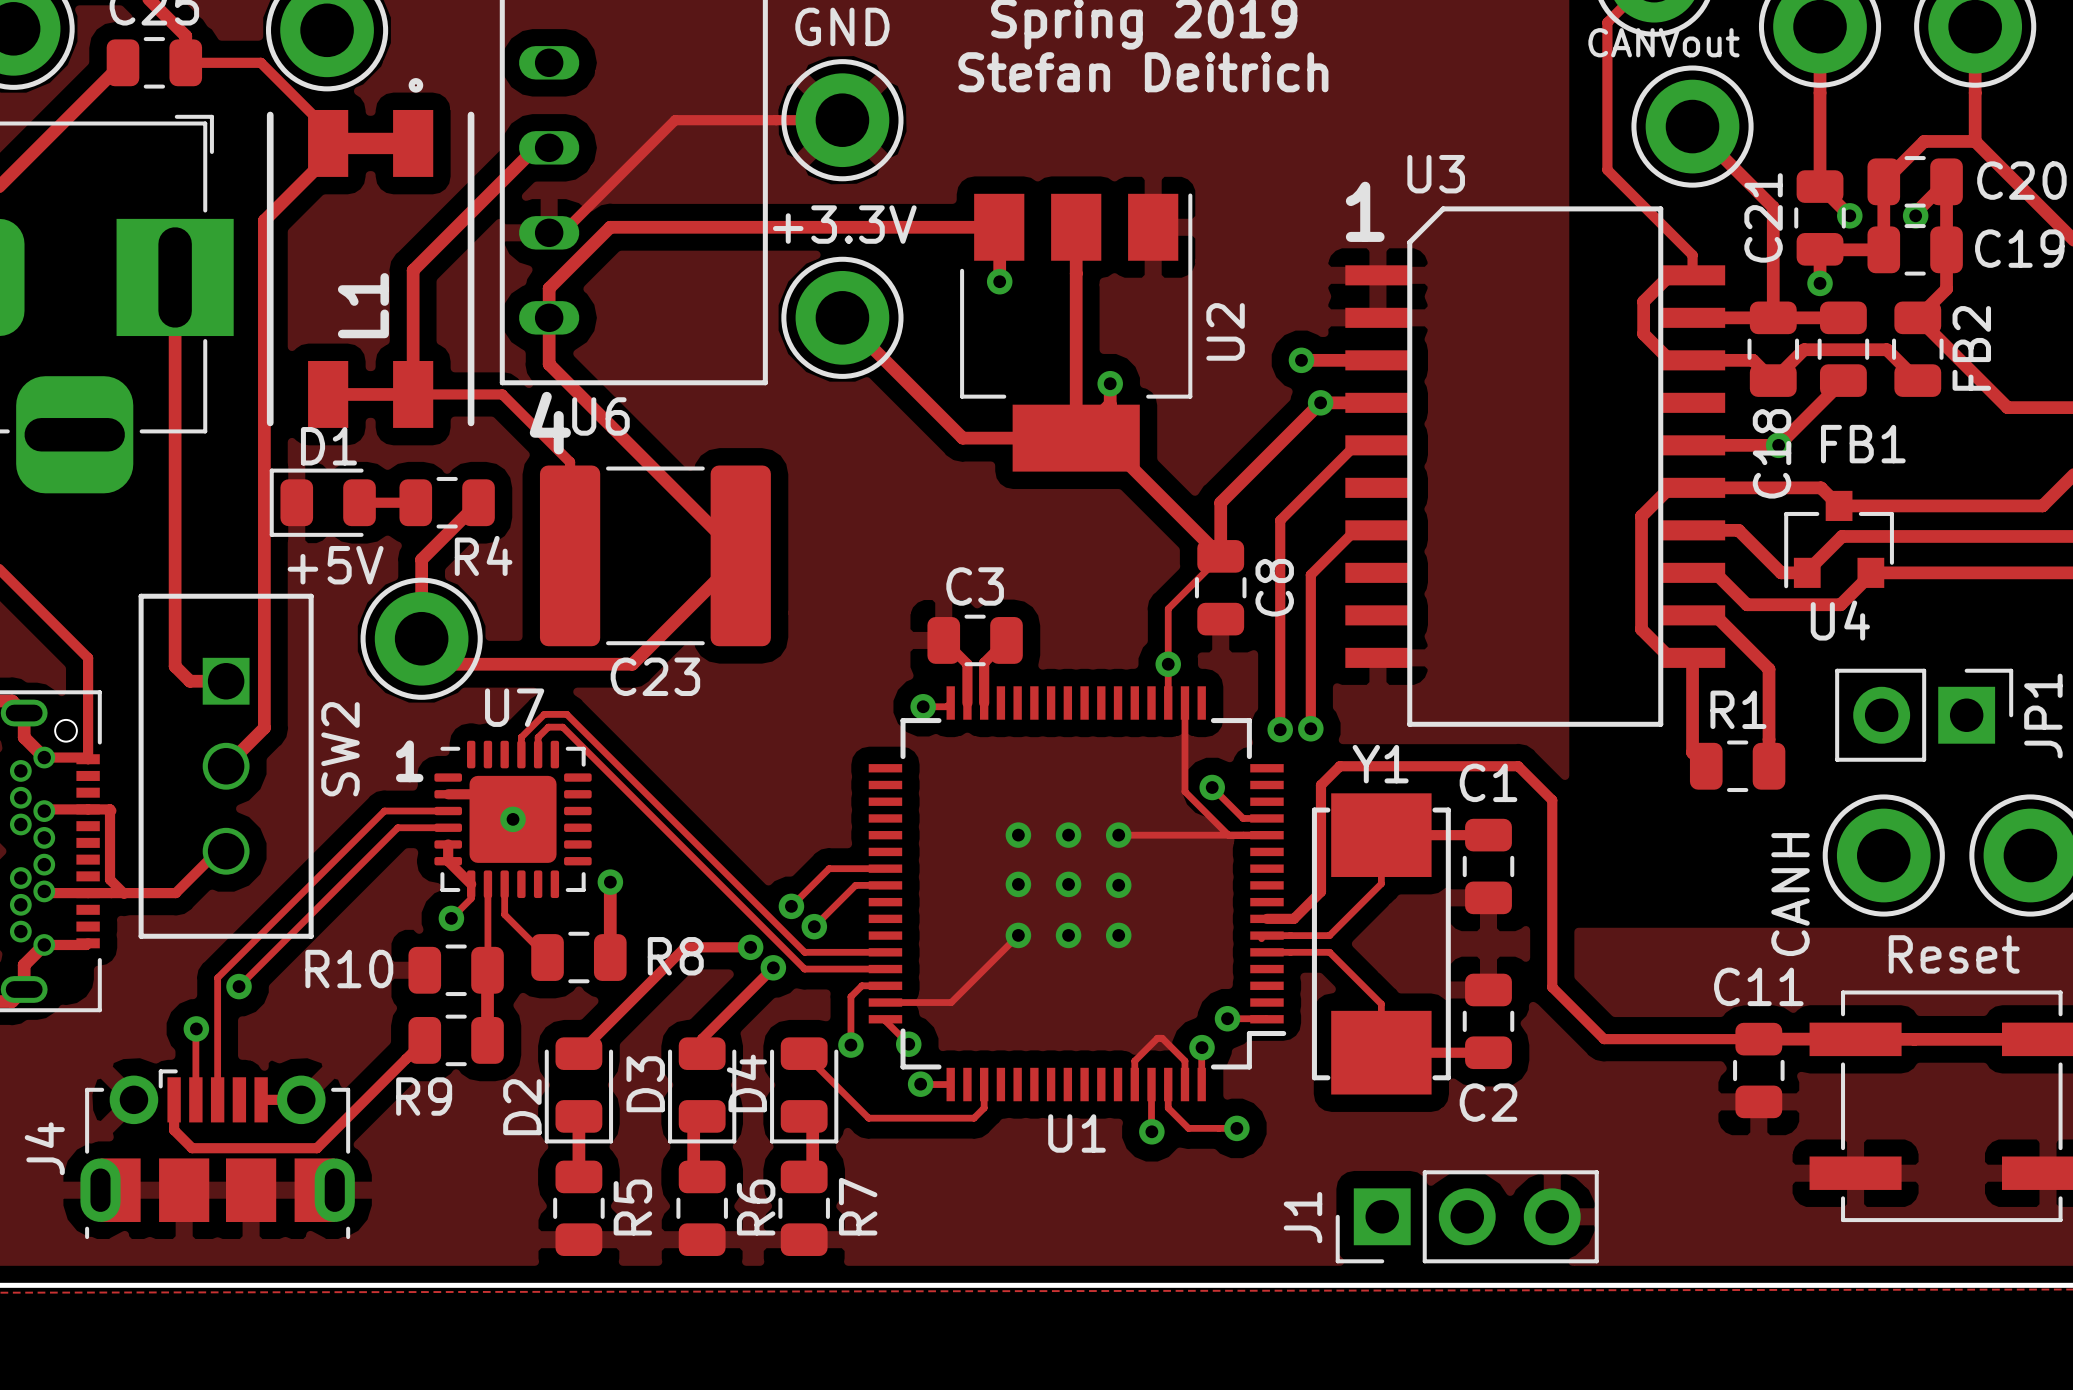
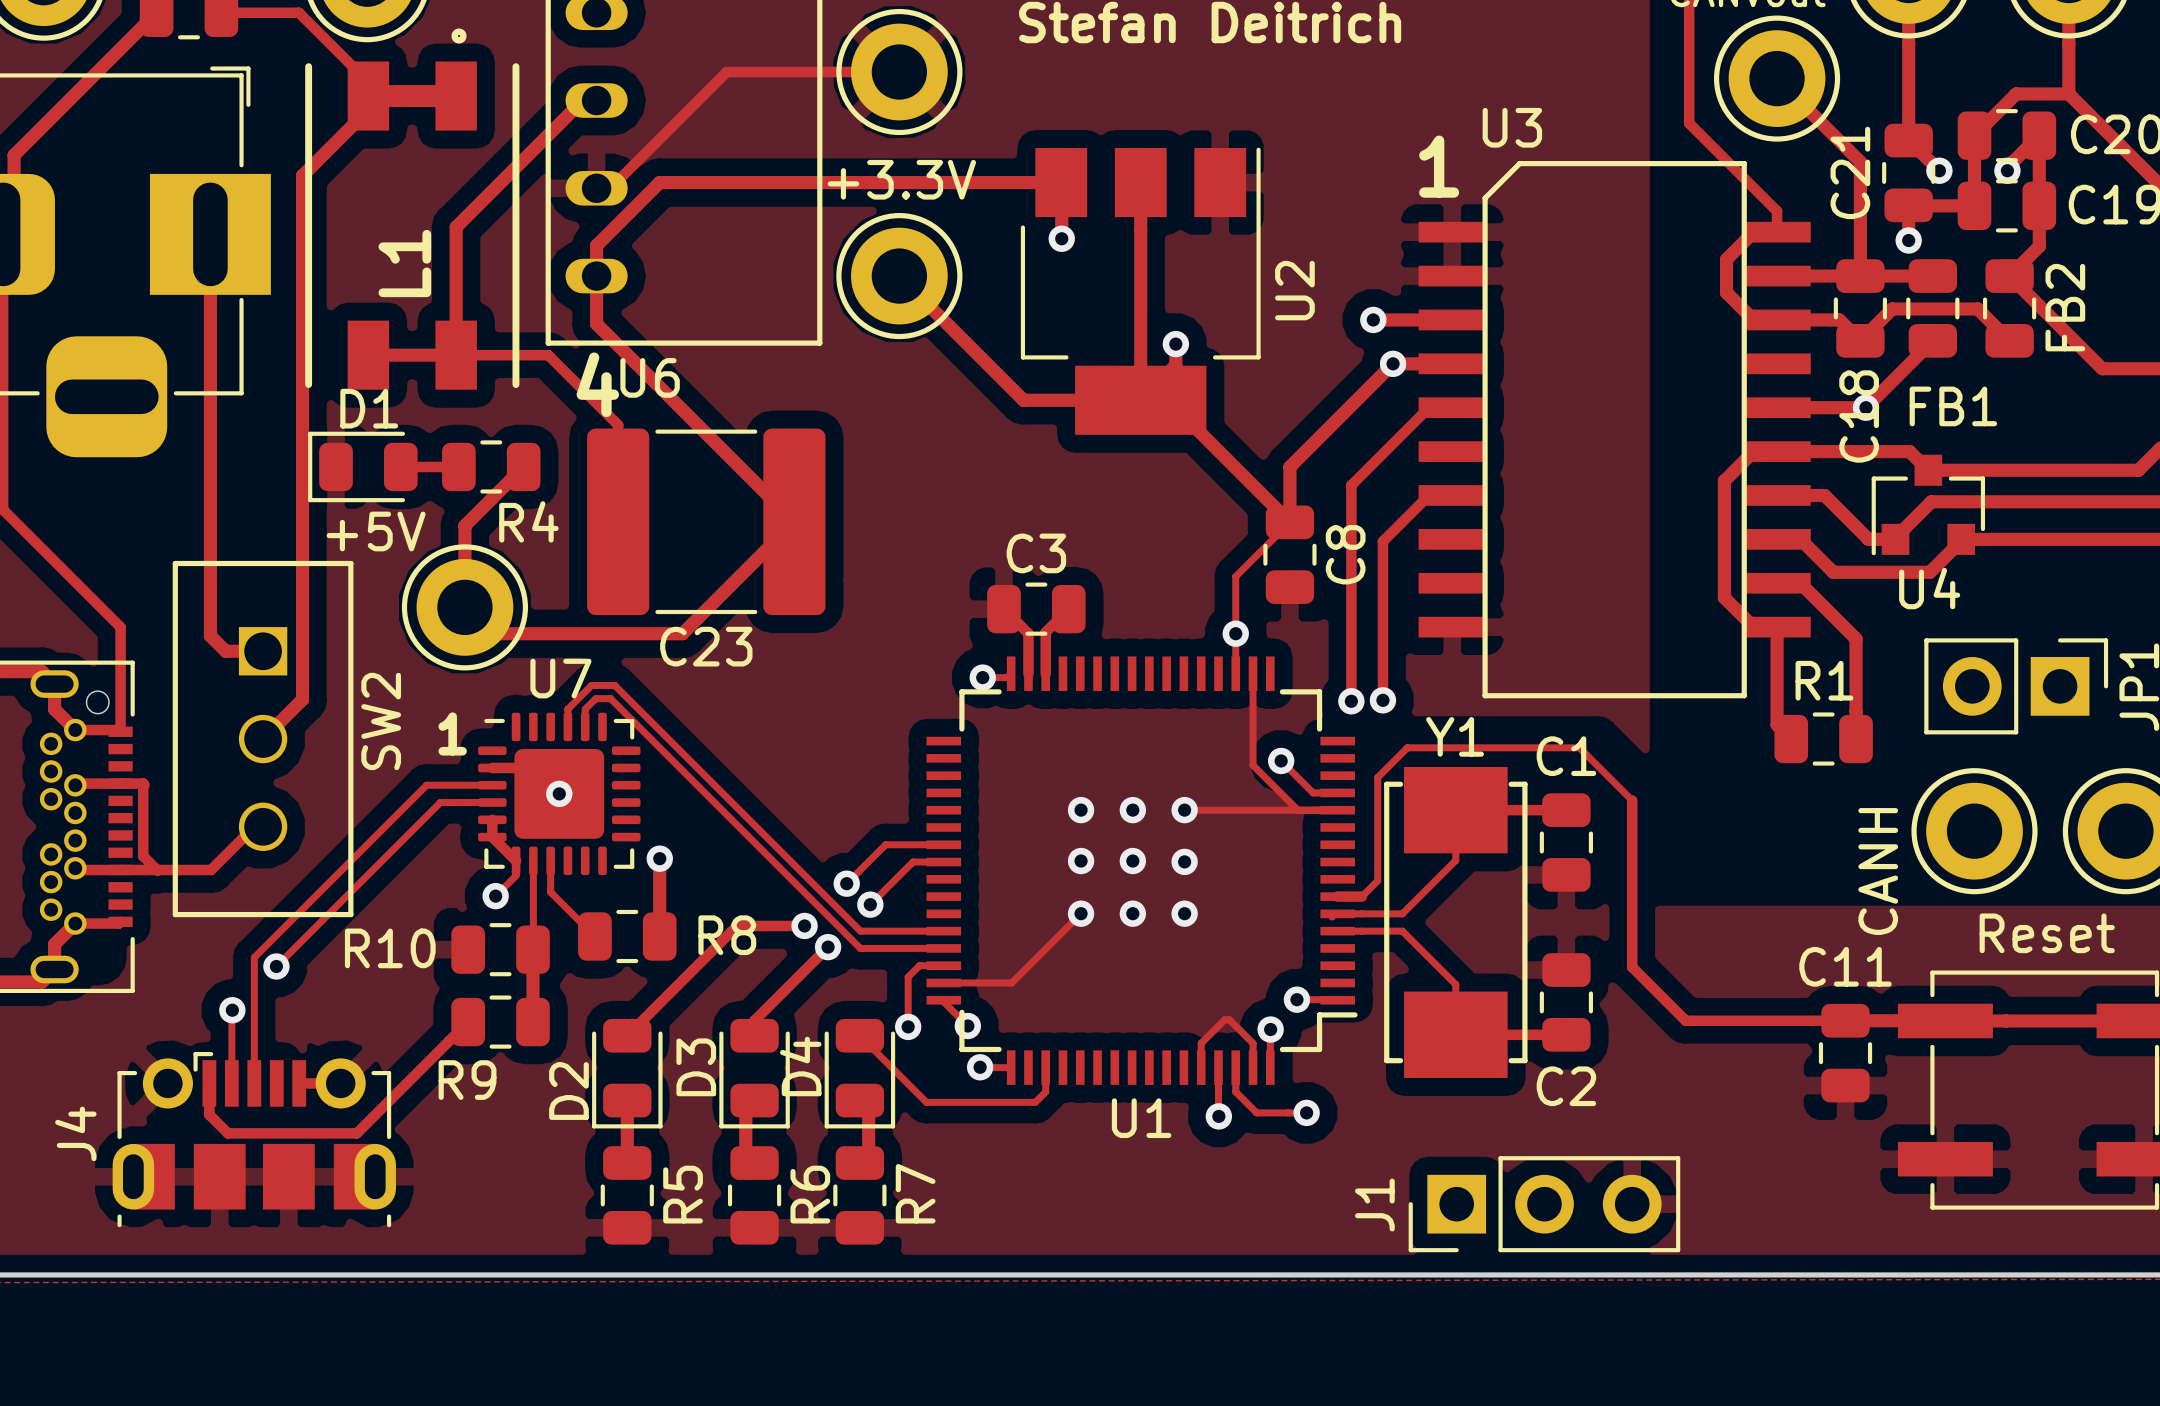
track: (1552, 825) (1552, 800) (1518, 766) (1339, 766) (1320, 785) (1320, 891) (1293, 918) (1290, 918) -> (1632, 800) (1579, 747) (1407, 747) (1377, 777) (1377, 880) (1361, 896)

